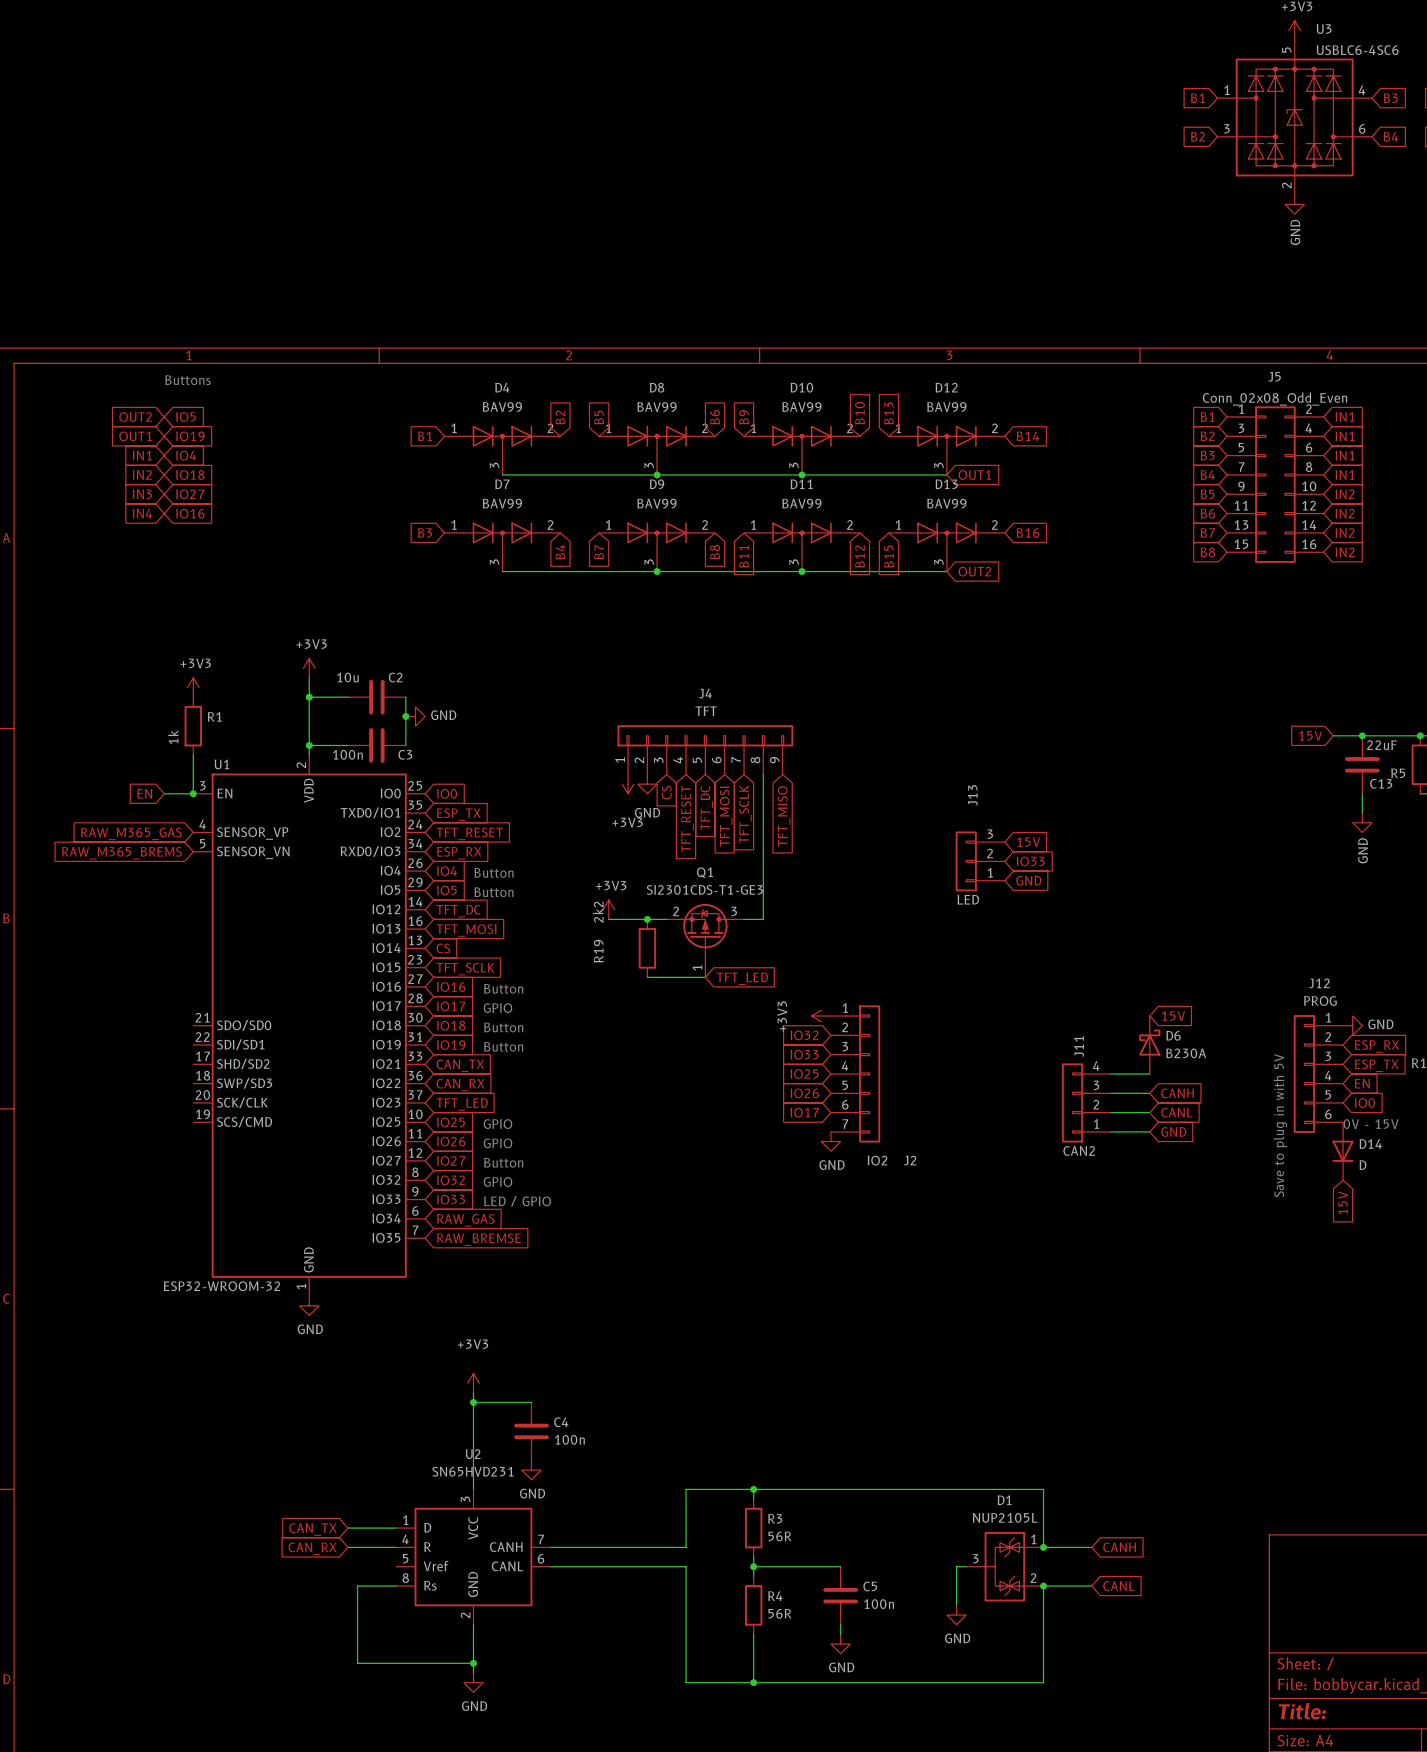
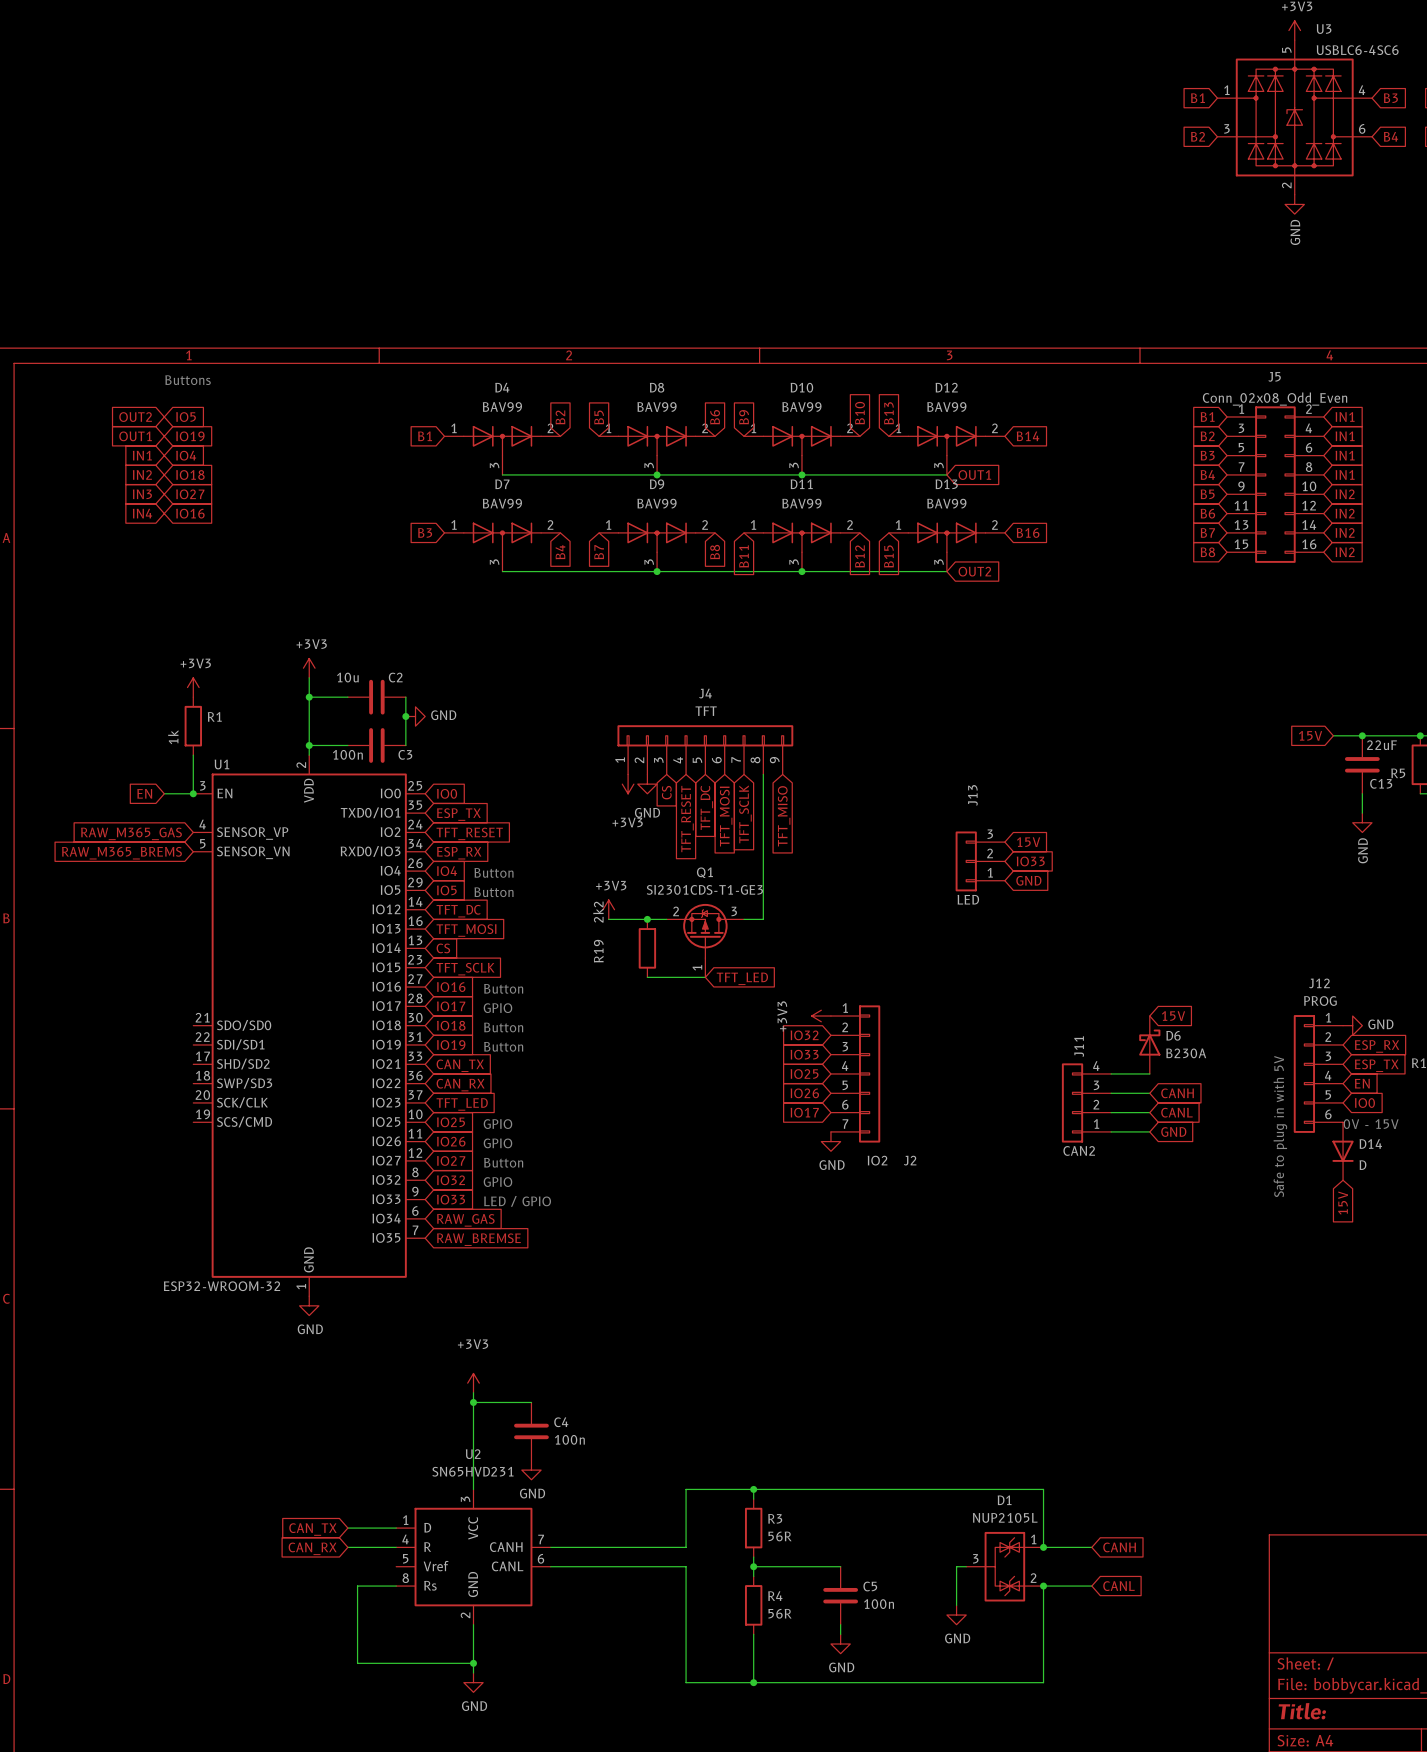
text: Save to plug in with 5V (1280, 1125) -> Safe to plug in with 5V (1280, 1126)

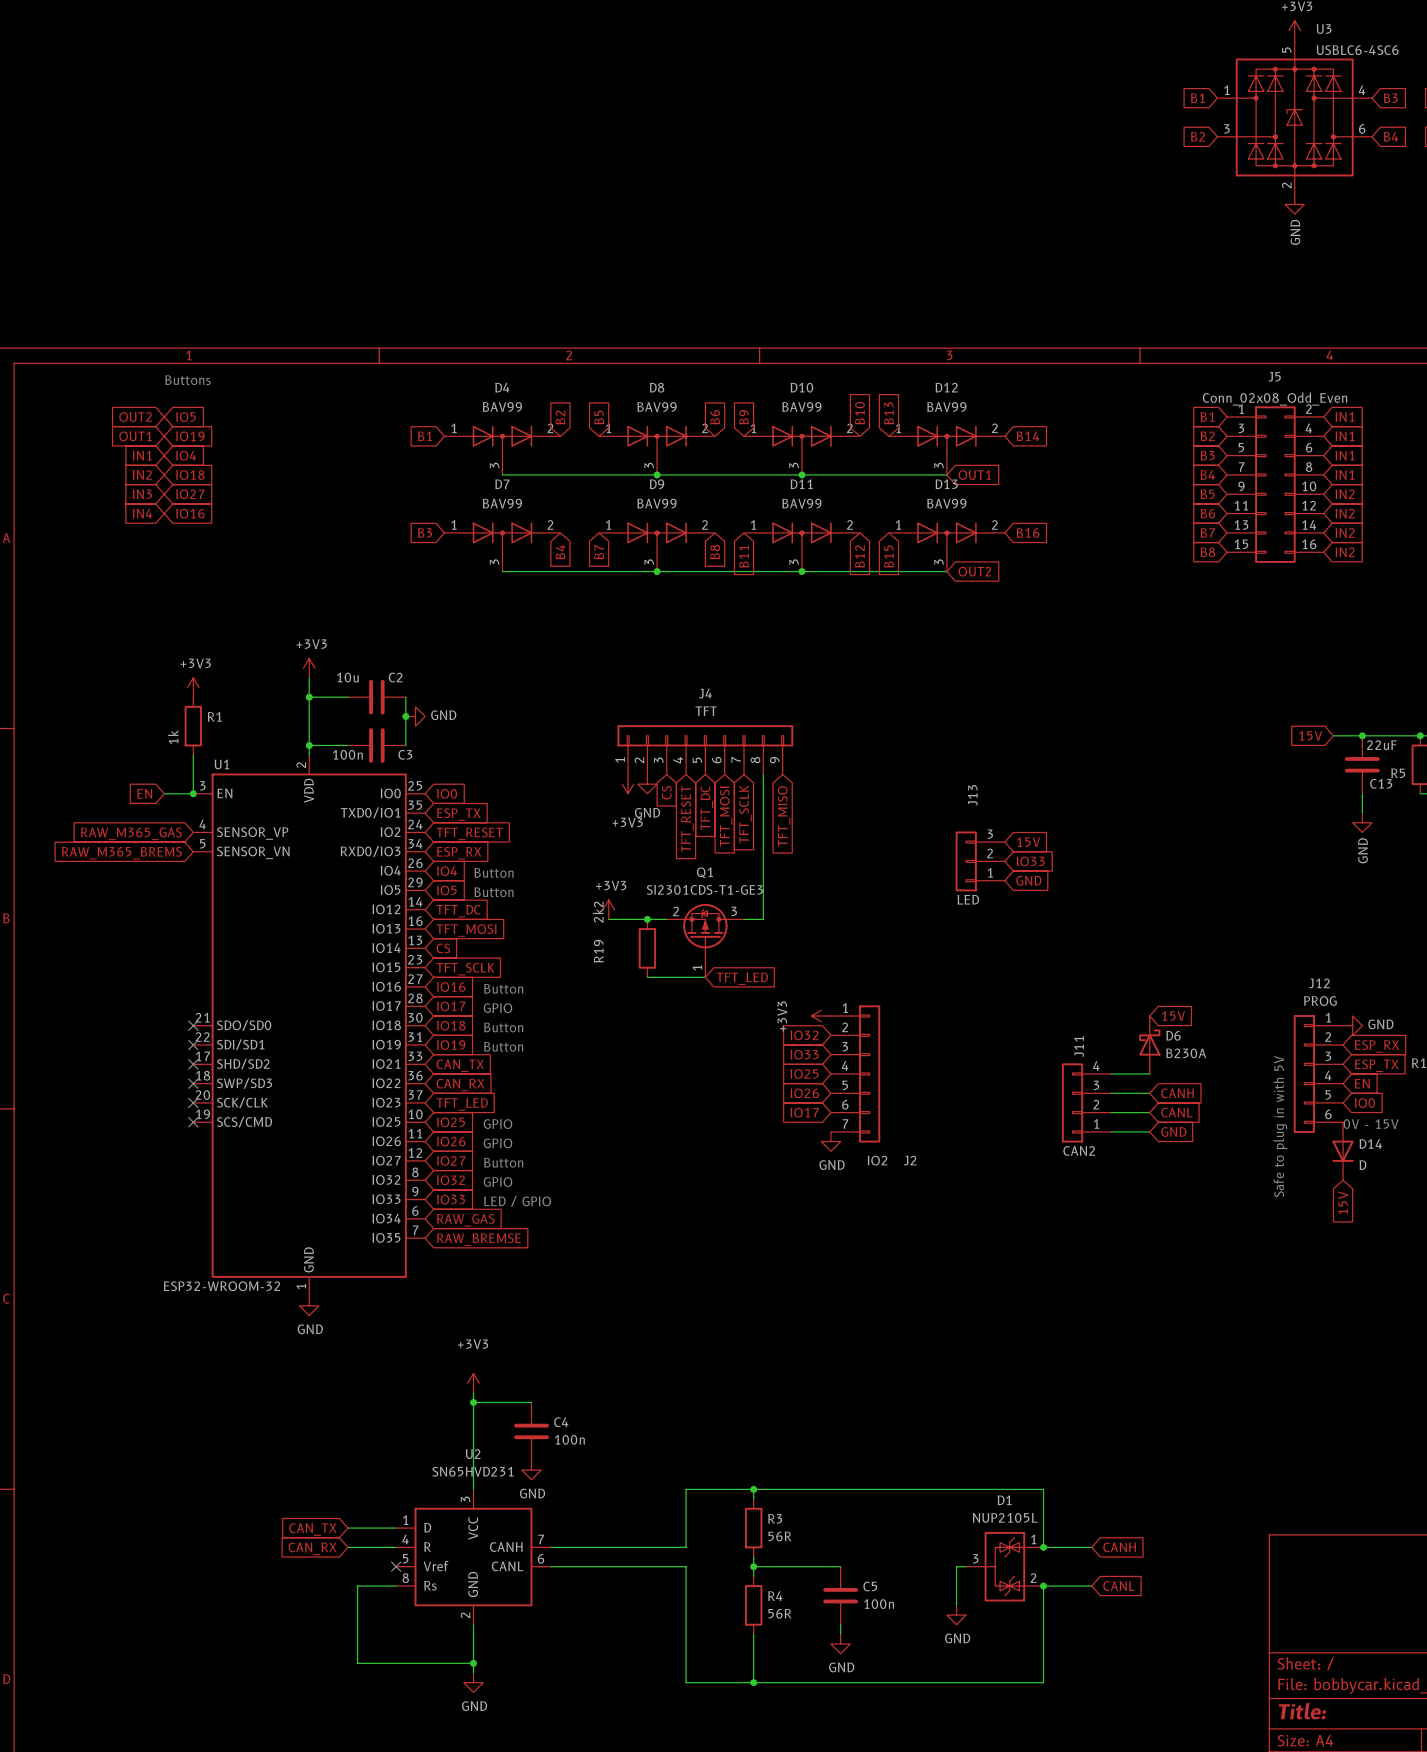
no-connect mark: none -> (193, 1025)
no-connect mark: none -> (193, 1044)
no-connect mark: none -> (193, 1064)
no-connect mark: none -> (193, 1083)
no-connect mark: none -> (193, 1102)
no-connect mark: none -> (193, 1122)
no-connect mark: none -> (396, 1566)

